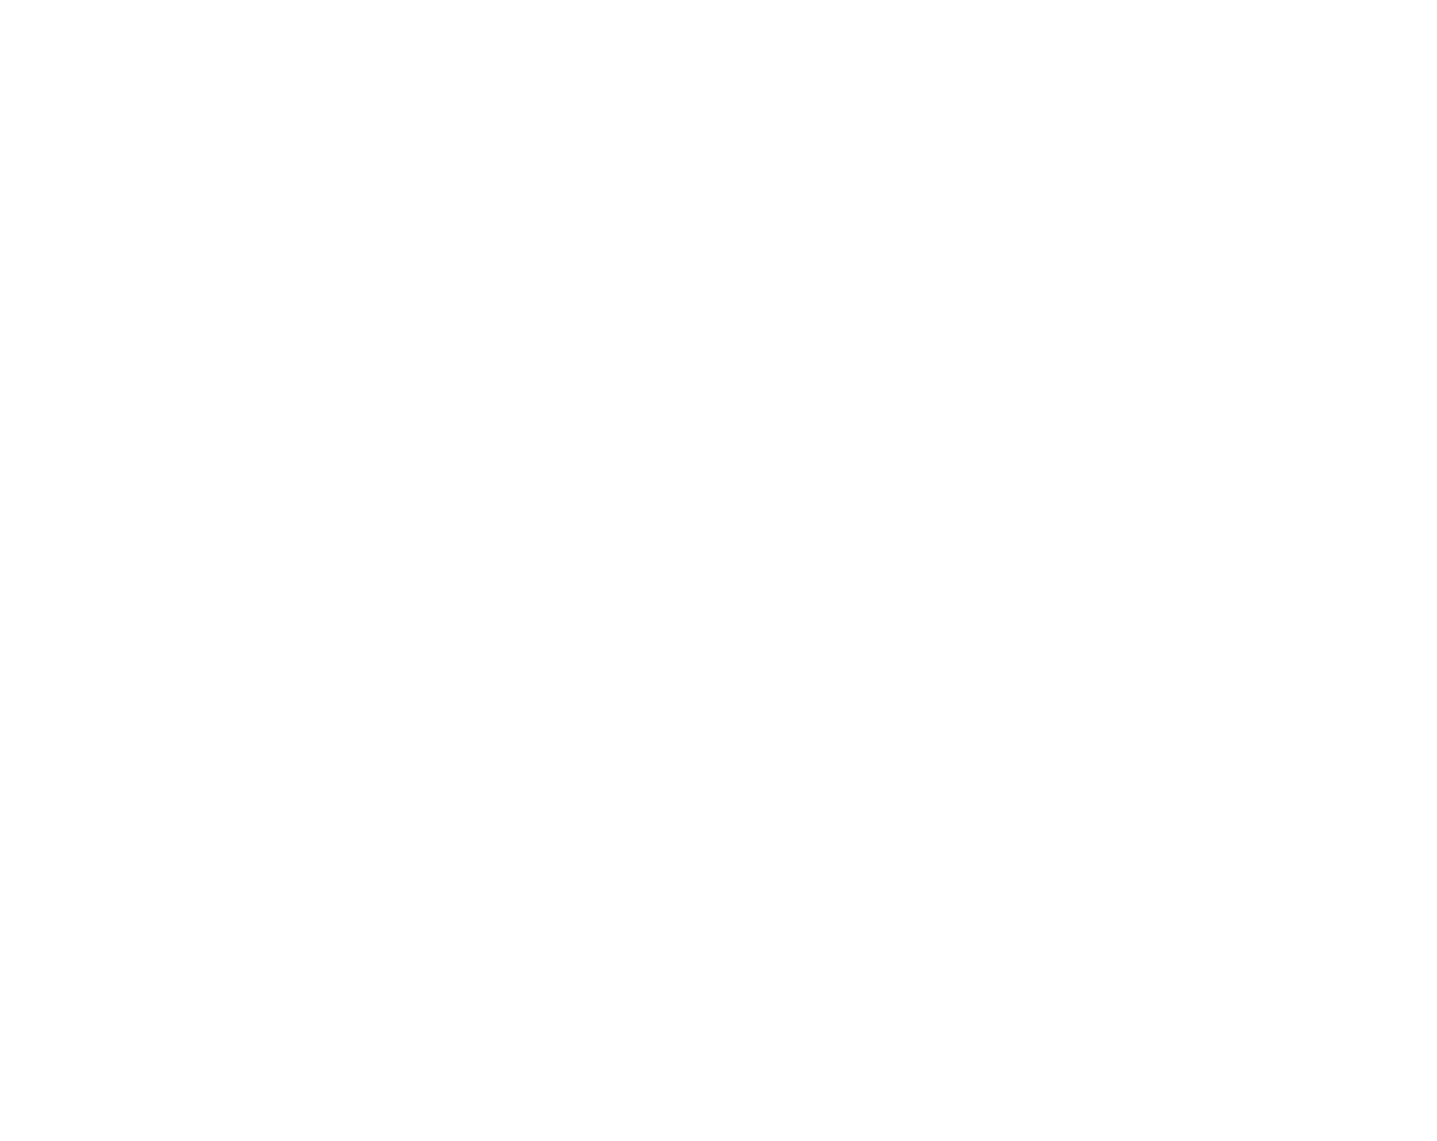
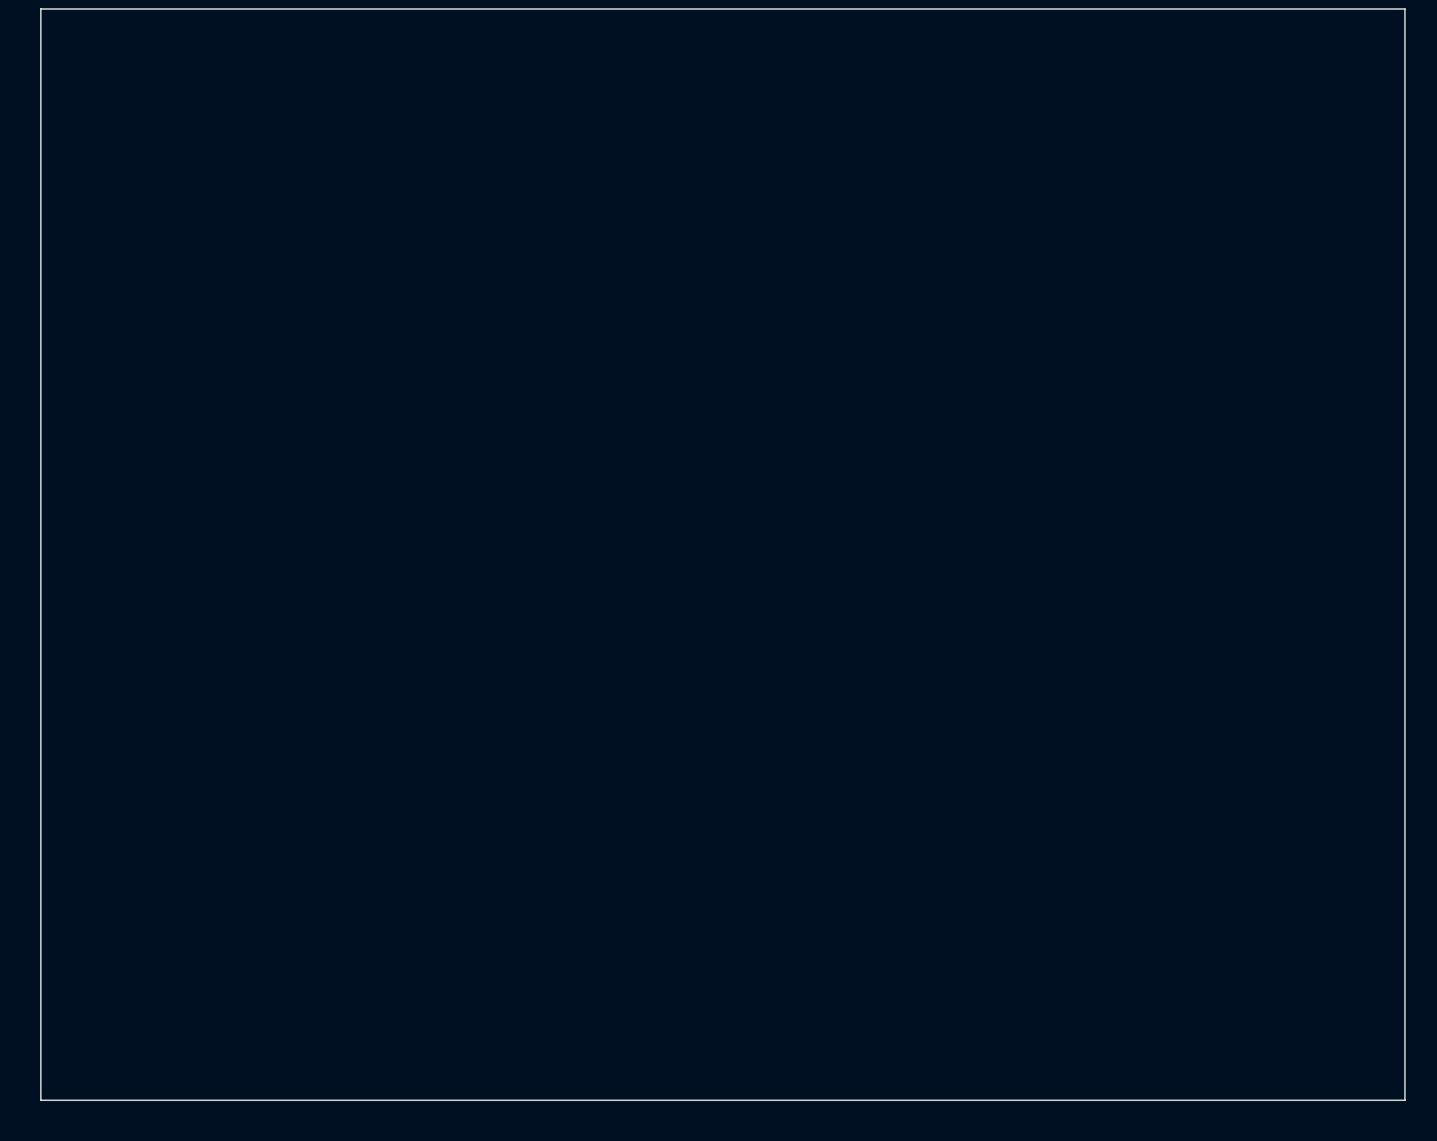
board edge: none -> (40, 8) (1404, 8) (1404, 1100) (40, 1100) (40, 8)

